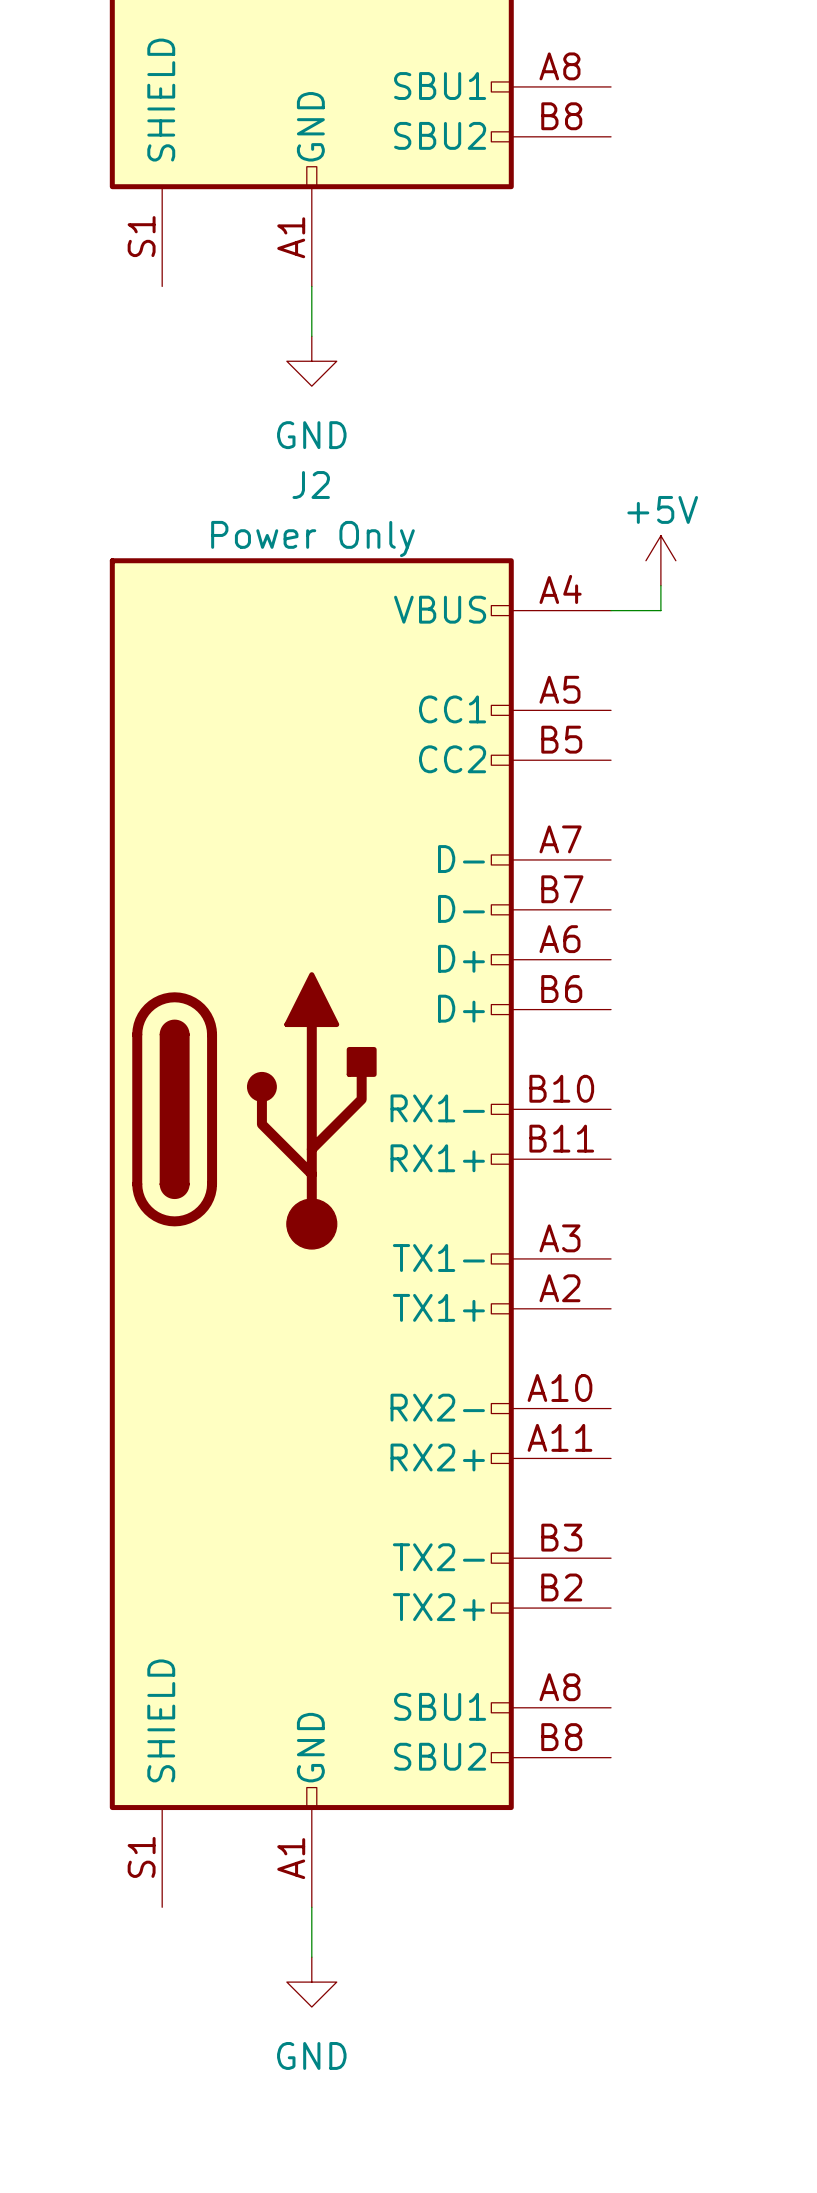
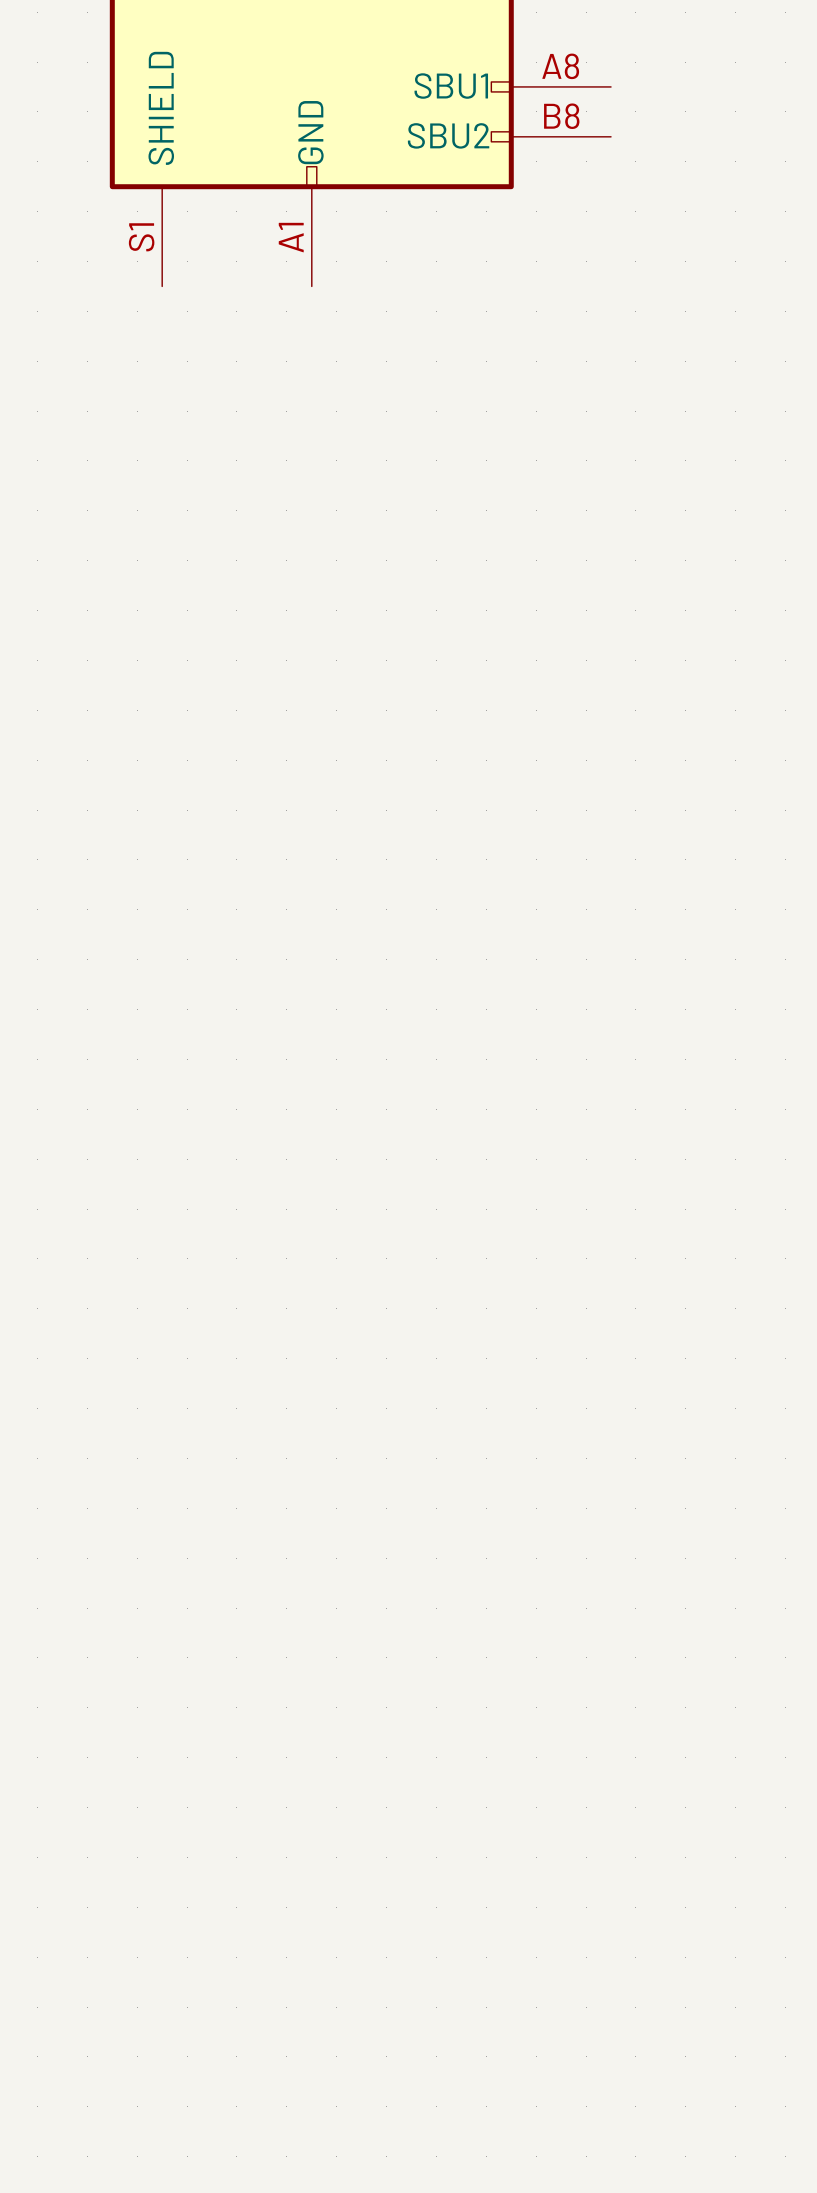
wire: (311, 286) (311, 336) -> none
power symbol: GND (311, 361) -> none
power symbol: +5V (660, 560) -> none
wire: (660, 585) (660, 610) (611, 610) -> none
J2: Power Only (360, 1232) -> none
wire: (311, 1907) (311, 1957) -> none
power symbol: GND (311, 1982) -> none

